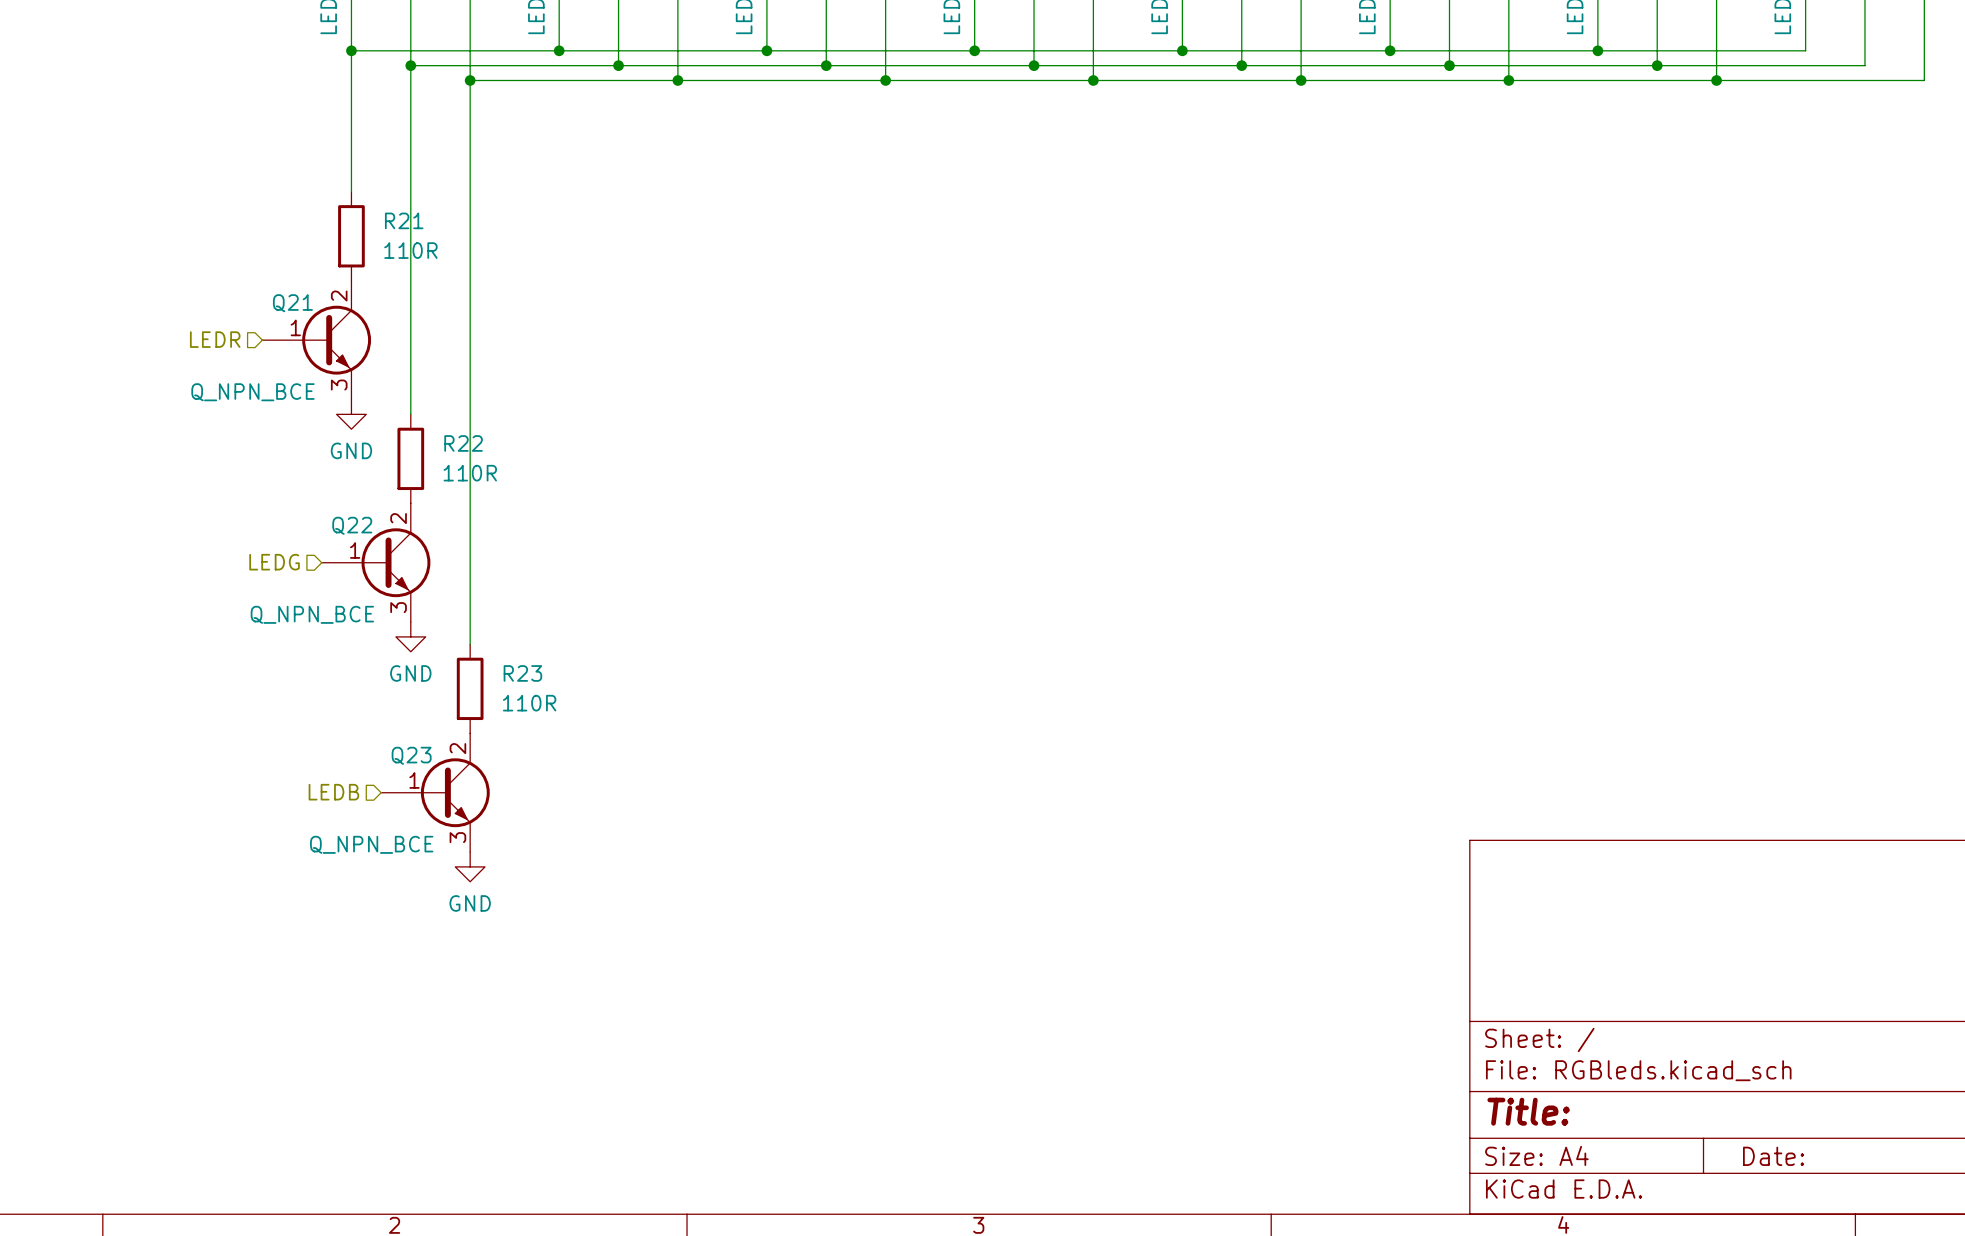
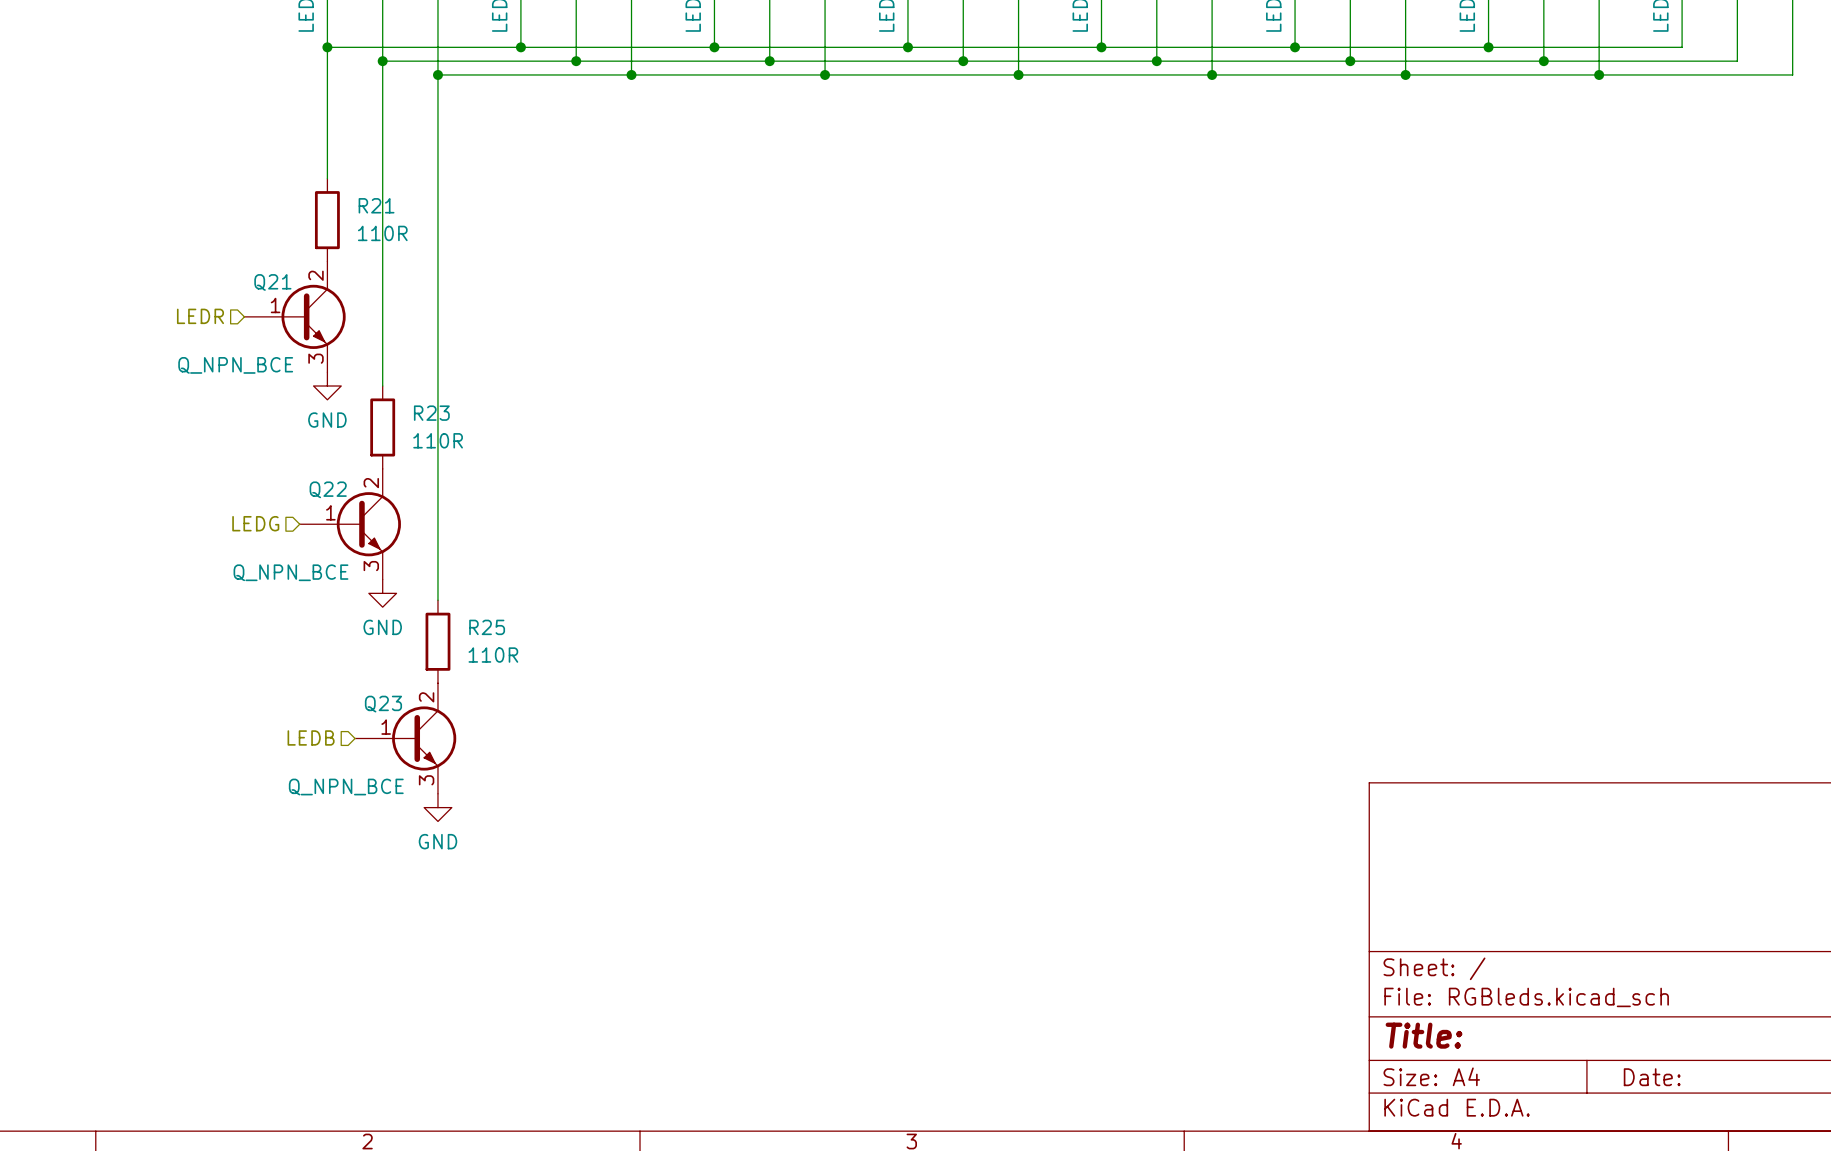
R22 name: R22 (463, 443) -> R23 (431, 413)
R23 name: R23 (522, 673) -> R25 (487, 627)

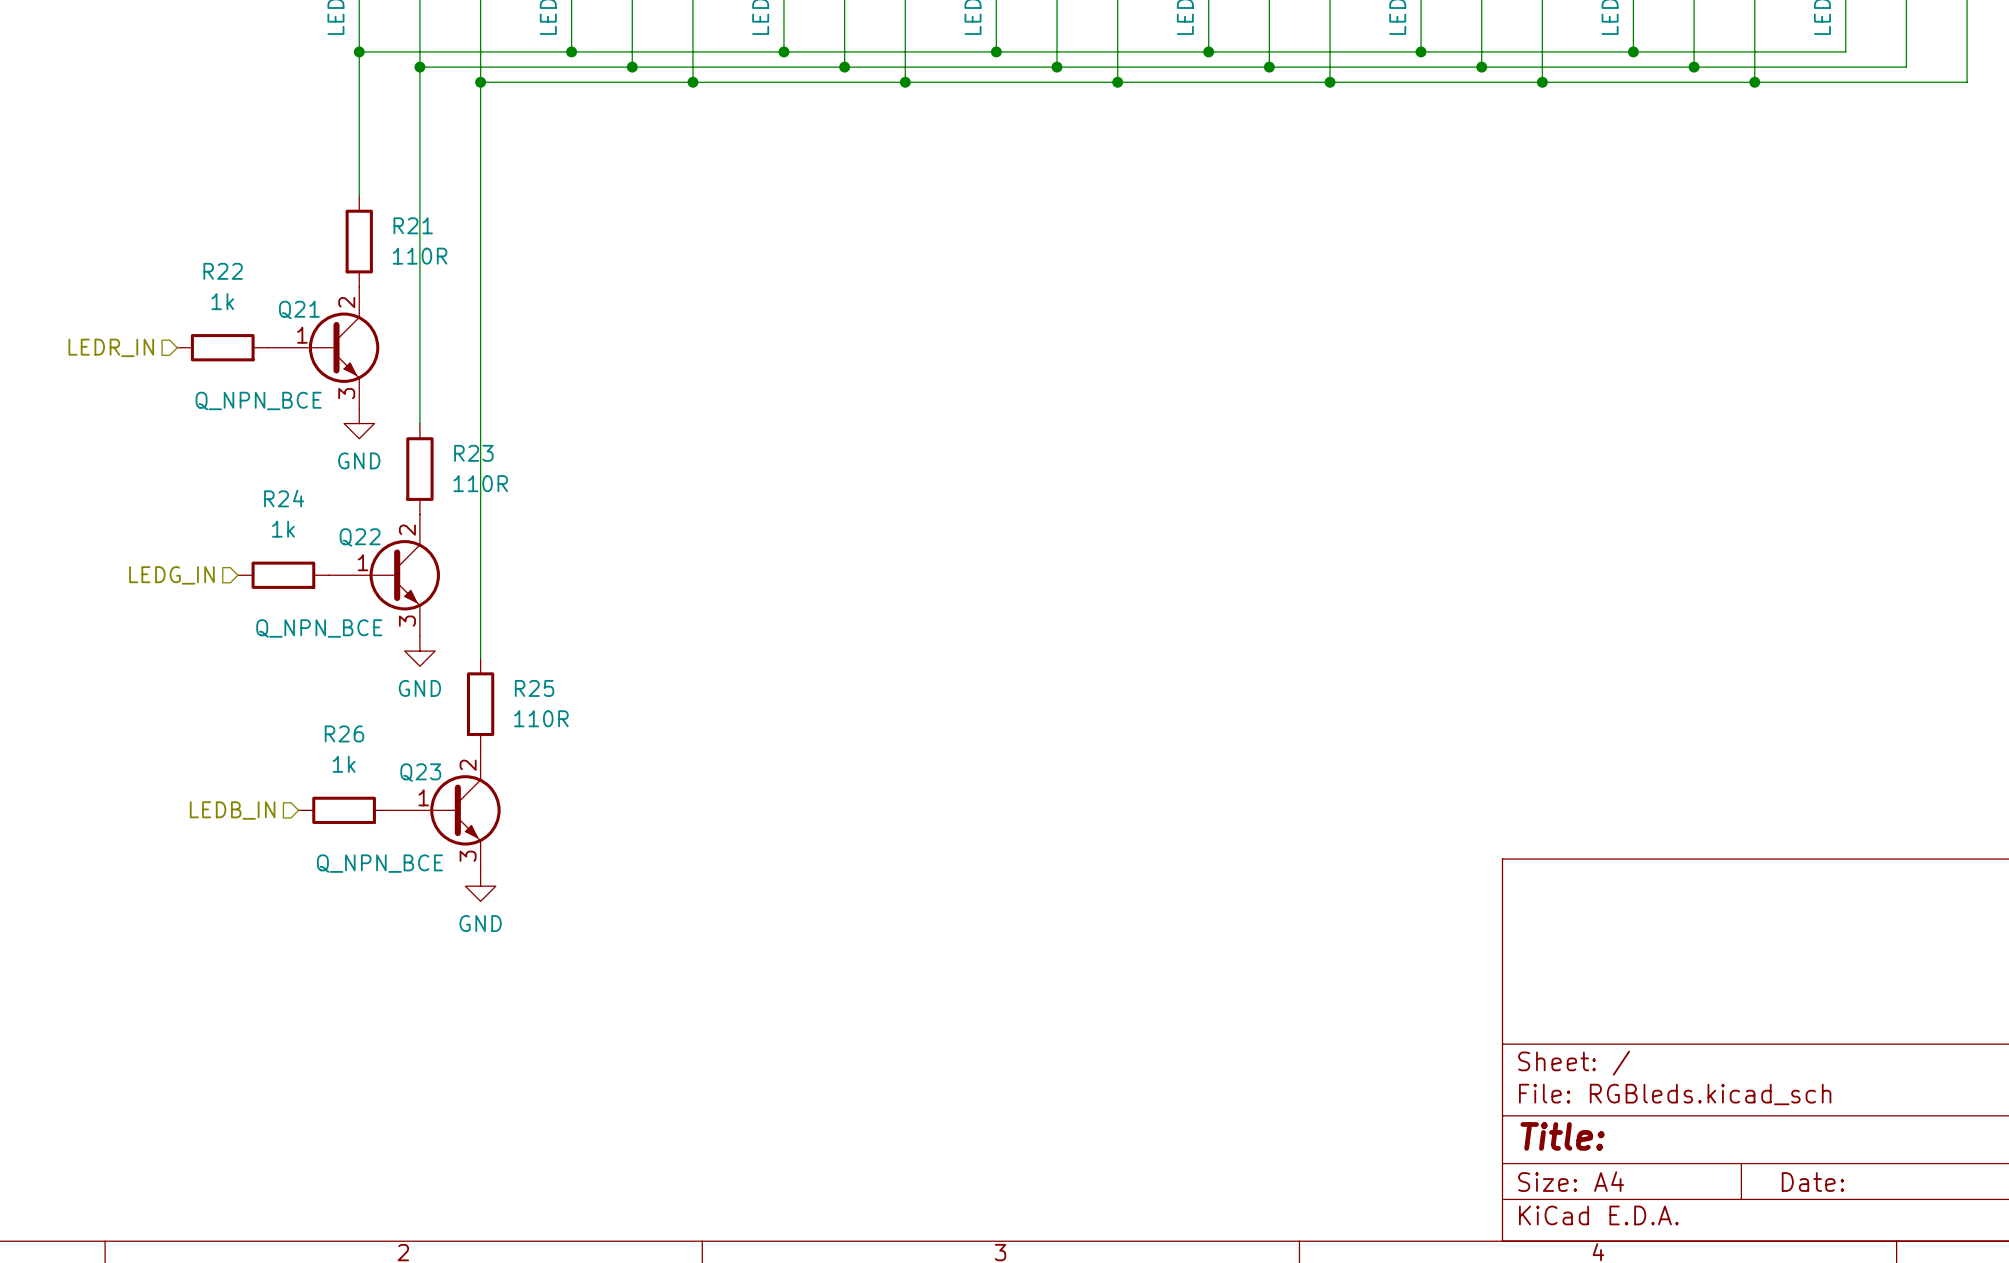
hierarchical label: LEDR (200, 316) -> none
R22: none -> 1k (222, 347)
hierarchical label: none -> LEDR_IN (111, 347)
hierarchical label: LEDG (255, 523) -> none
hierarchical label: none -> LEDG_IN (171, 575)
R24: none -> 1k (283, 575)
hierarchical label: LEDB (311, 737) -> none
hierarchical label: none -> LEDB_IN (232, 810)
R26: none -> 1k (344, 810)

